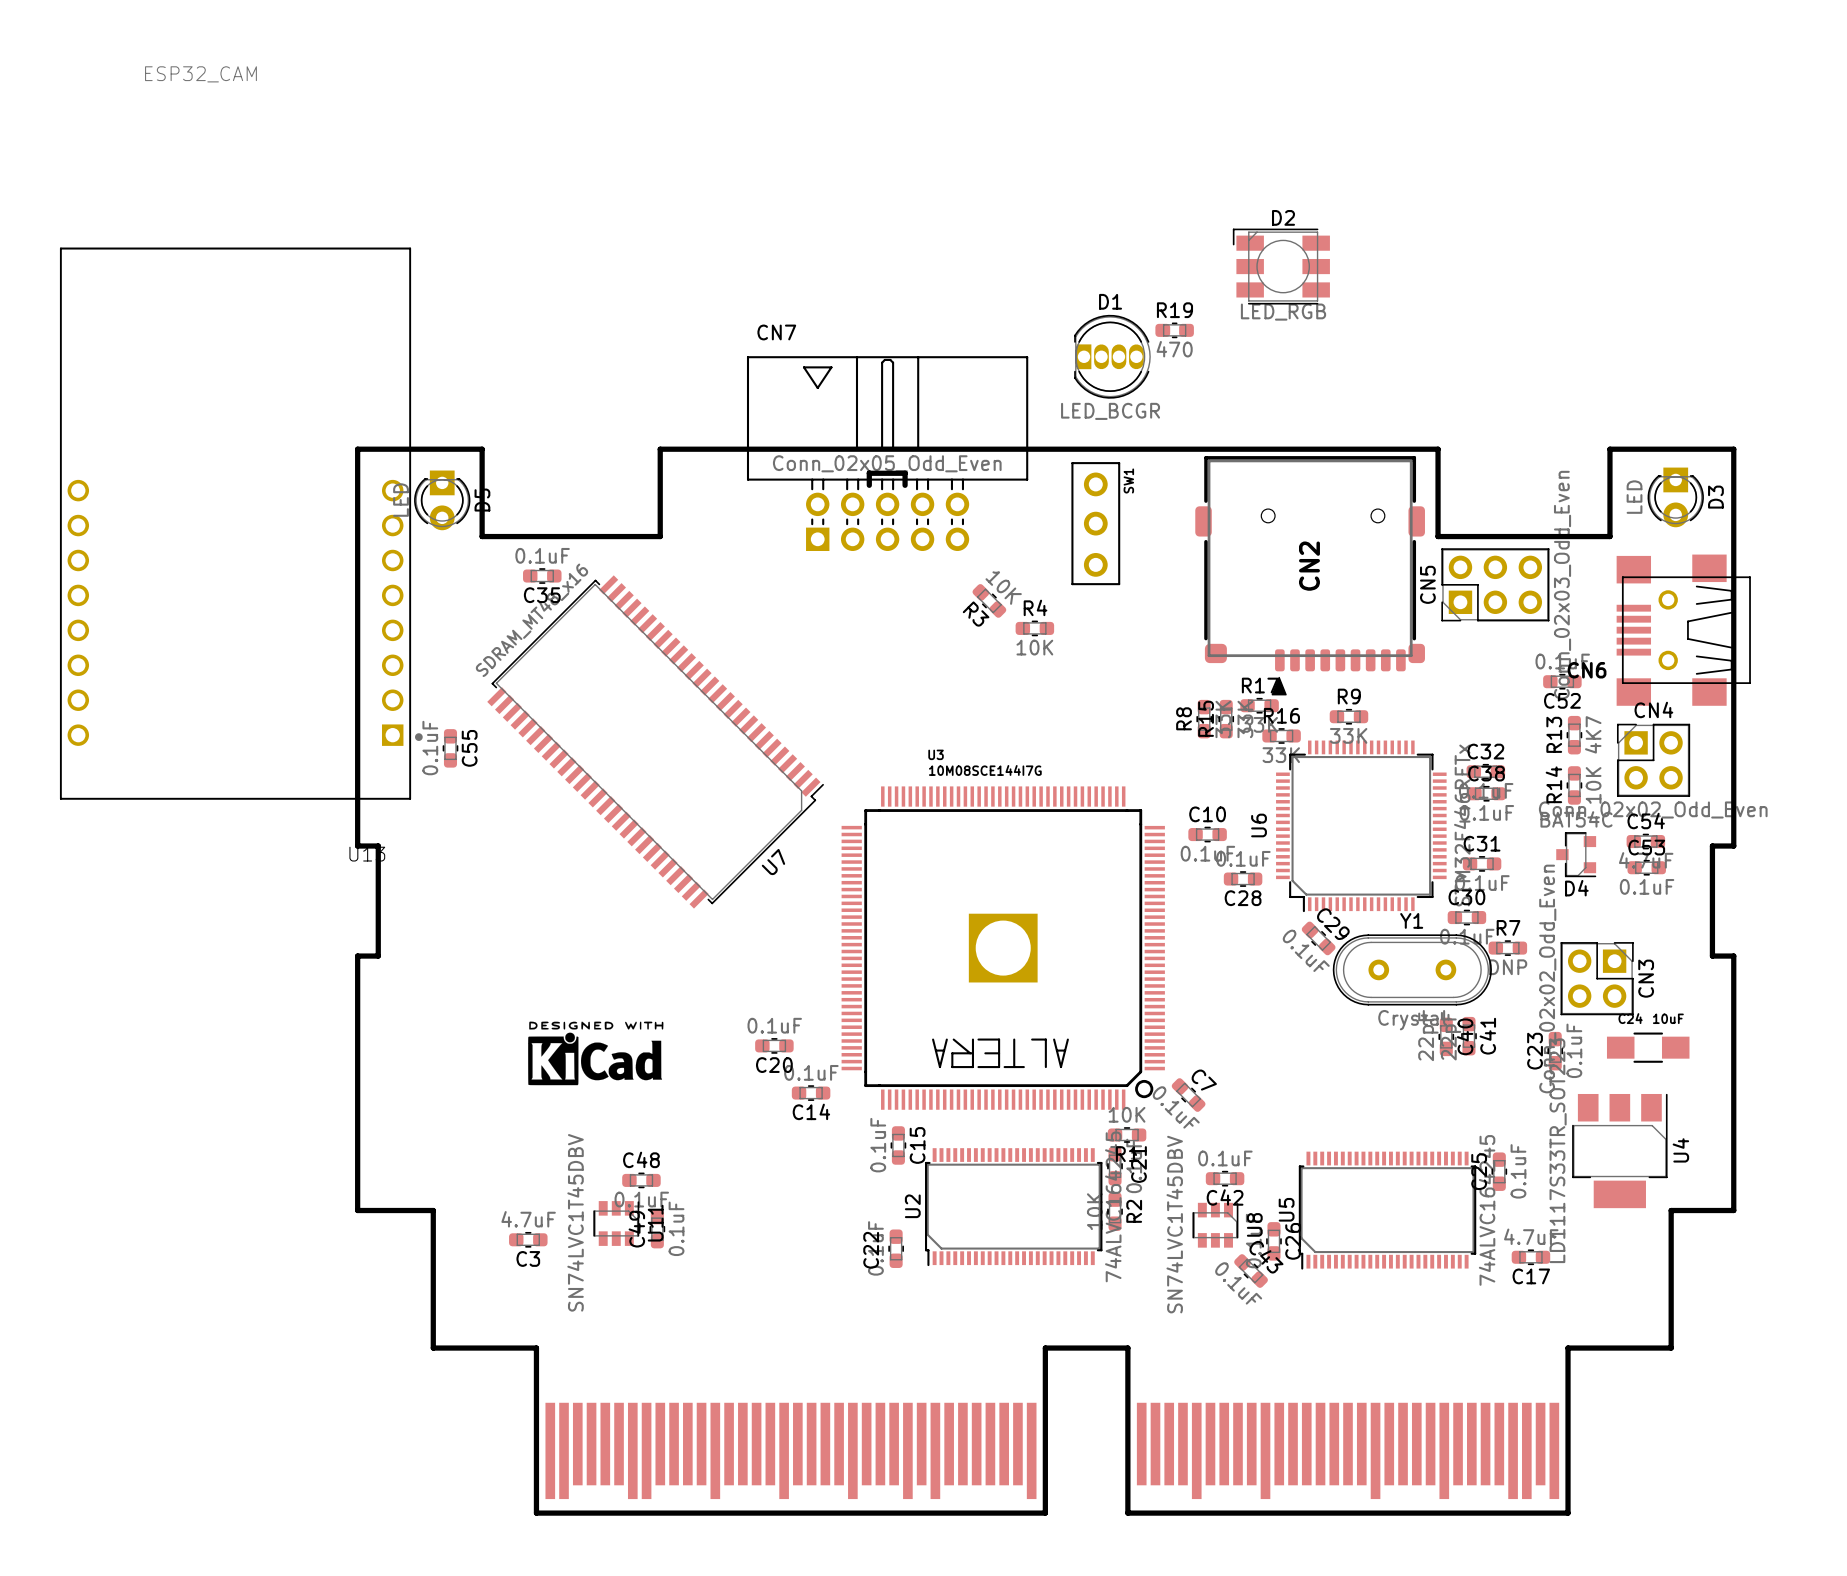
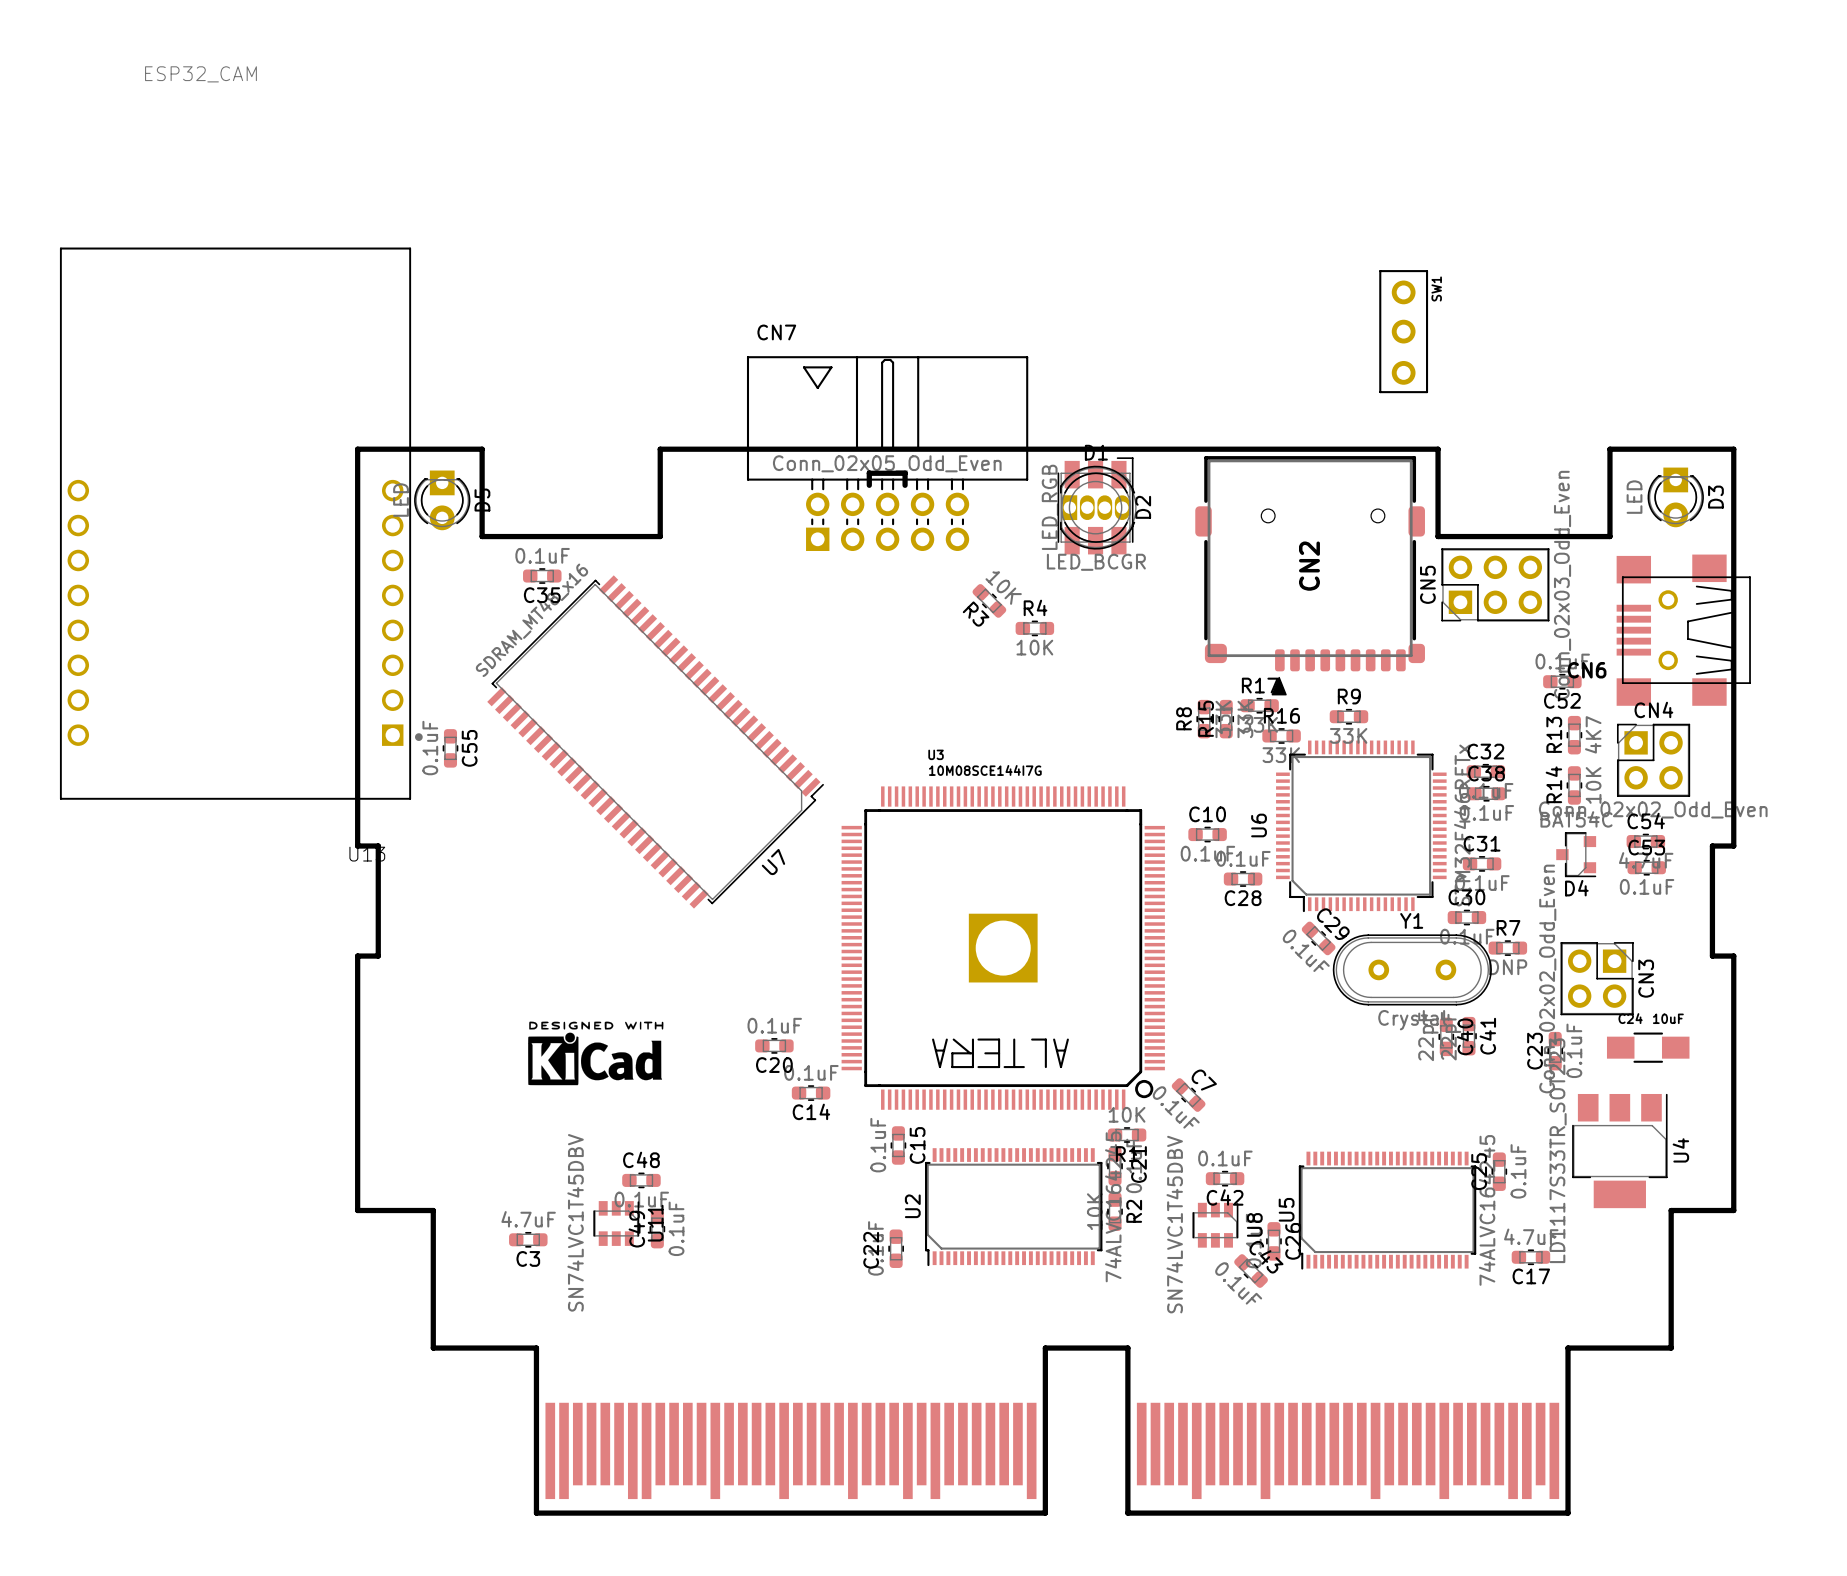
D2 rotation: 0° (1281, 266) -> 90° clockwise (1095, 505)
D2 position: (1281, 266) -> (1095, 505)
R19: 470 (1174, 330) -> none
D1 position: (1112, 356) -> (1098, 507)
SW1 position: (1095, 523) -> (1403, 331)

